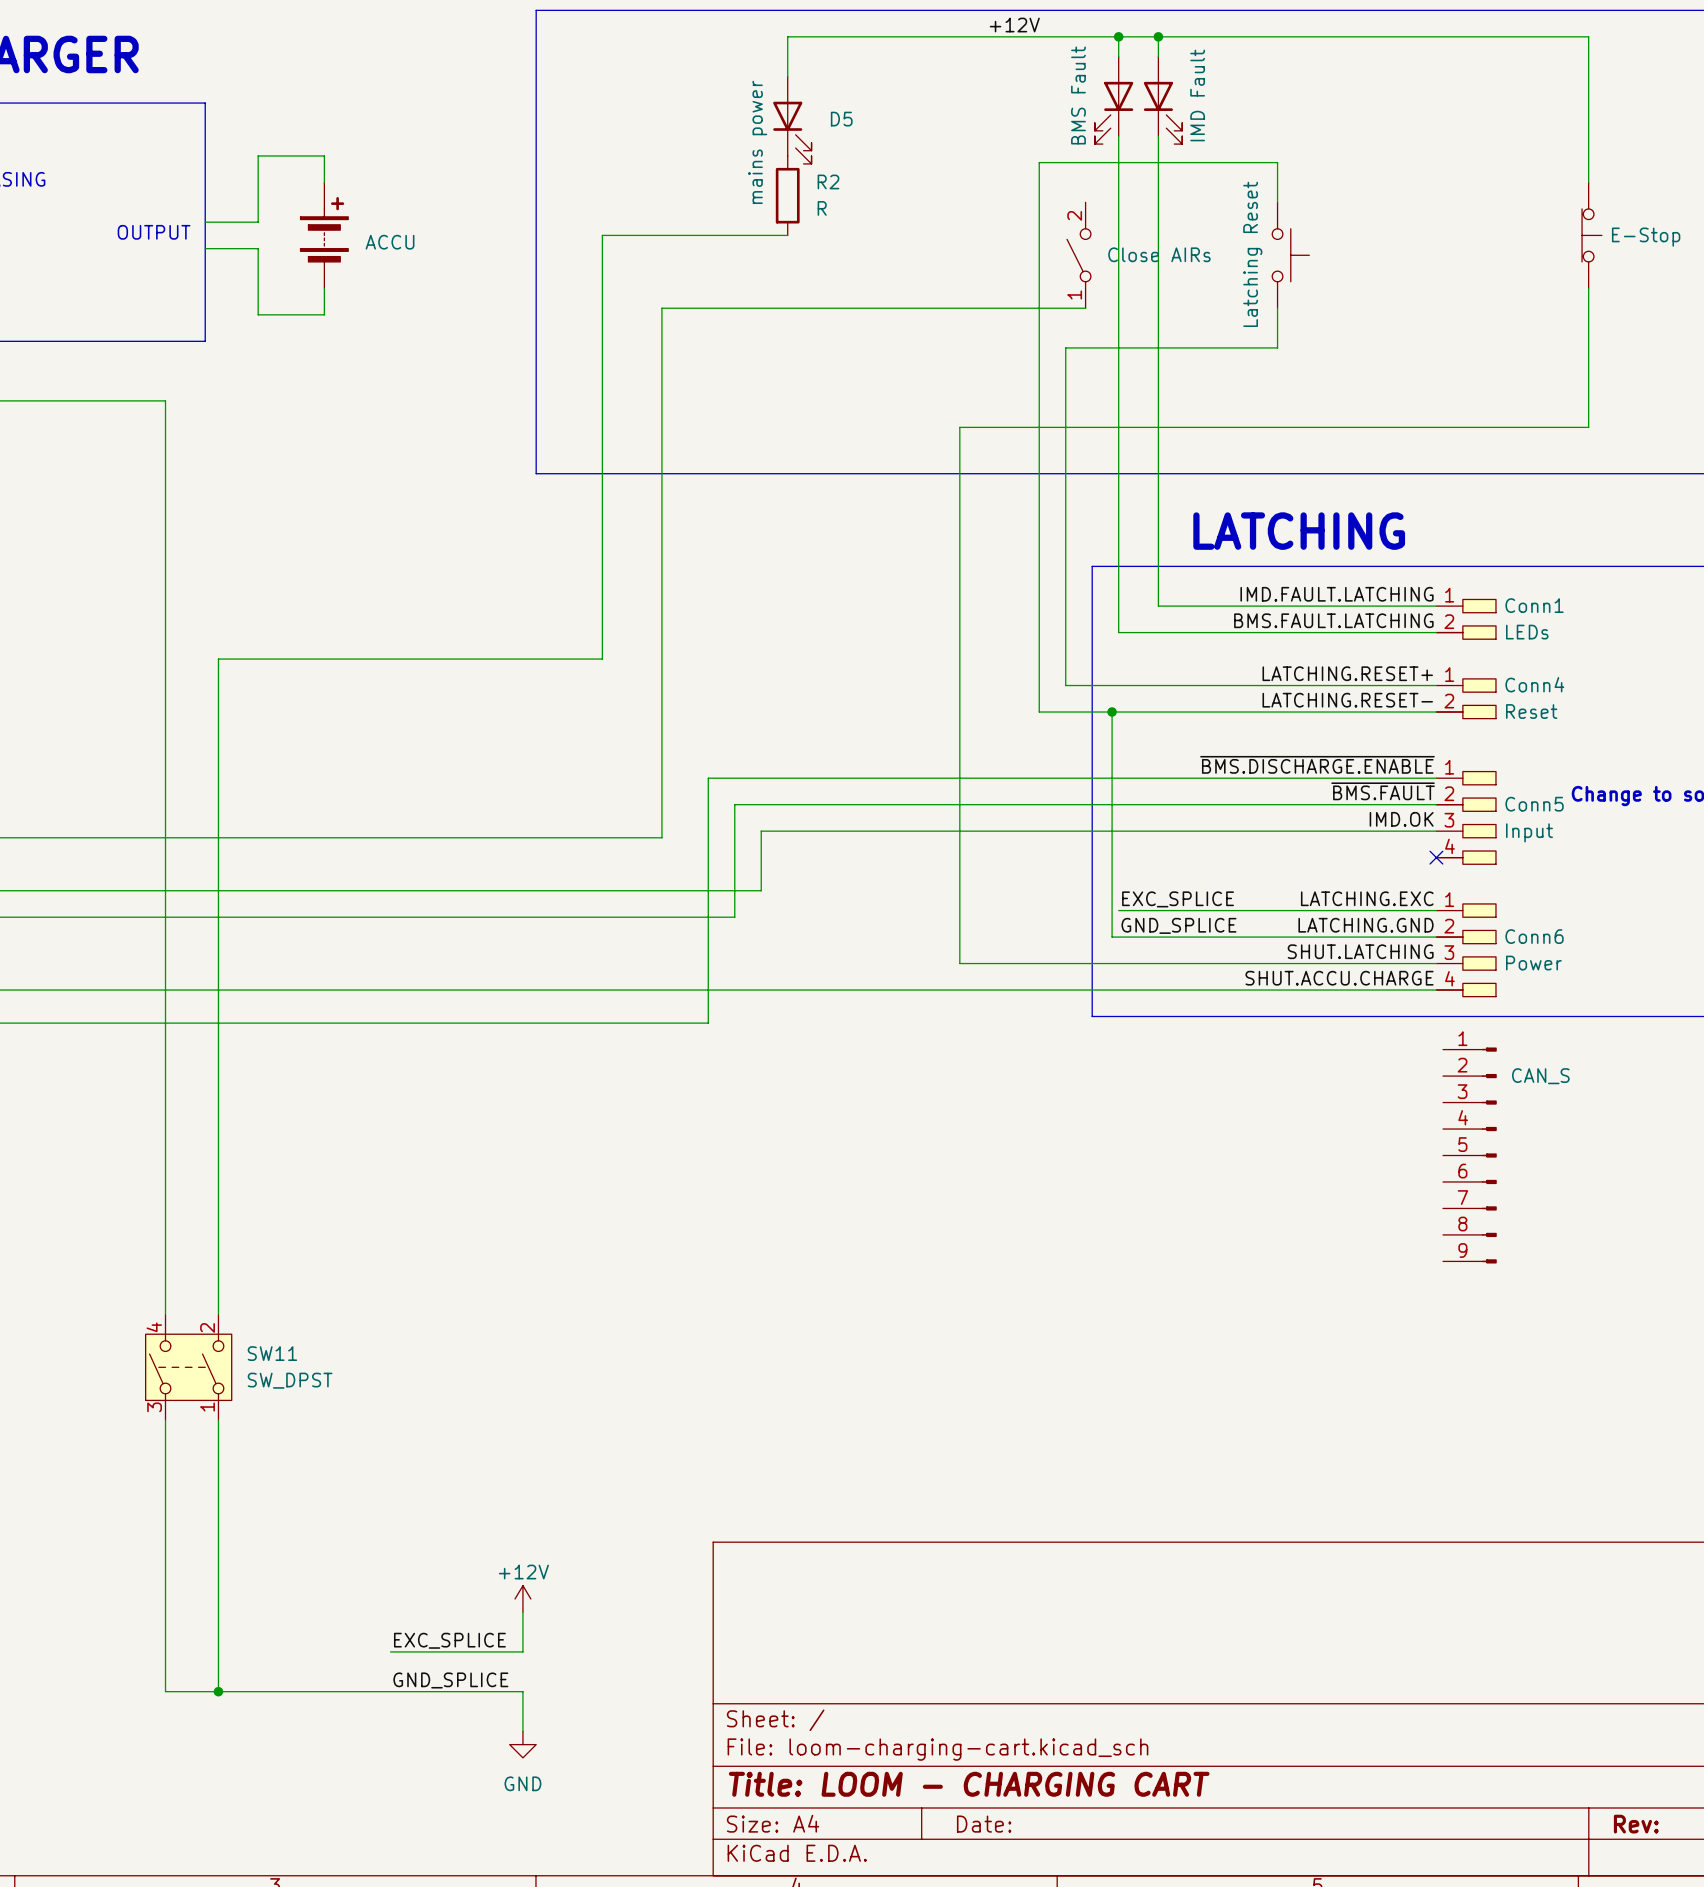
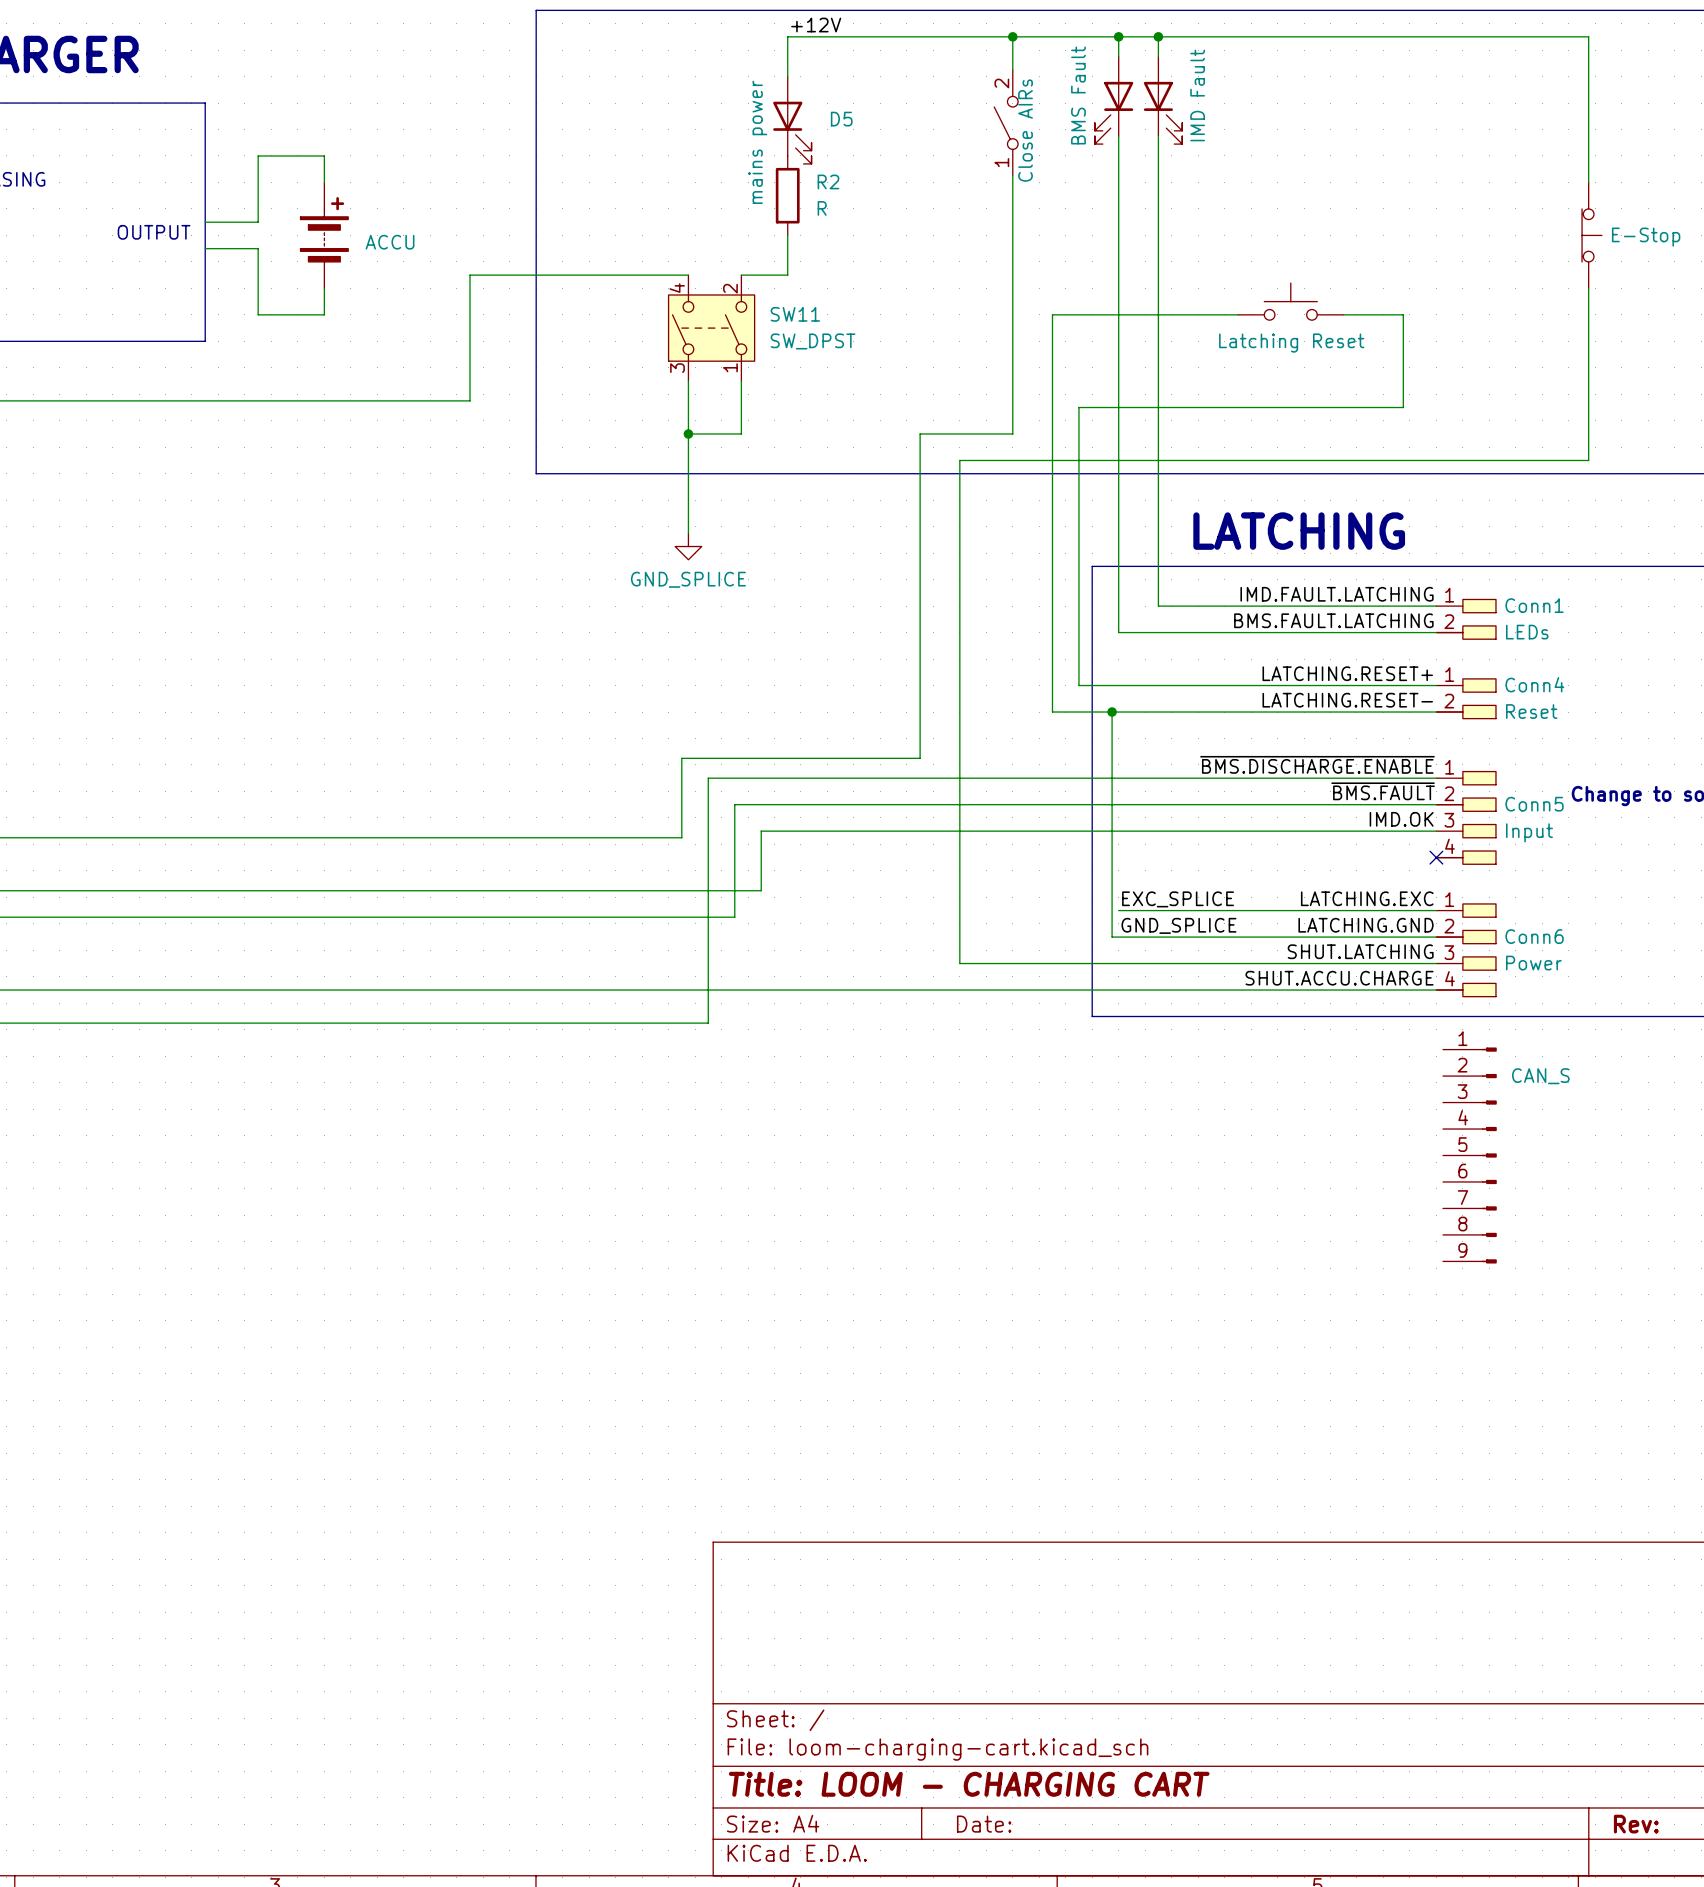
label position: +12V (1014, 25) -> +12V (816, 25)
wire: none -> (1012, 36) (1012, 69)
junction: none -> (1012, 36)
wire: (1277, 202) (1277, 162) (1039, 162) (1039, 712) (1052, 712) -> (1237, 314) (1052, 314) (1052, 712)
wire: (787, 235) (602, 235) (602, 659) (218, 659) (218, 1314) -> (787, 235) (787, 275) (741, 275)
part value rotation: 0° (1159, 254) -> 90° counterclockwise (1025, 130)
part position: (1078, 255) -> (1006, 122)
part rotation: 0° (1290, 255) -> 90° counterclockwise (1290, 301)
wire: (1085, 308) (661, 308) (661, 837) -> (1012, 175) (1012, 434) (920, 434) (920, 758) (681, 758) (681, 837) (661, 837)
wire: (1277, 308) (1277, 347) (1065, 347) (1065, 685) (1078, 685) -> (1343, 314) (1403, 314) (1403, 407) (1078, 407) (1078, 685)
wire: none -> (688, 381) (688, 533)
wire: none -> (741, 381) (741, 434) (688, 434)
wire: (165, 400) (165, 1314) -> (165, 400) (469, 400) (469, 275) (688, 275)
wire: (1588, 427) (959, 427) (959, 460) -> (1588, 427) (1588, 460) (959, 460)
junction: none -> (688, 434)
power symbol: none -> GND_SPLICE (688, 546)
SW11 position: (188, 1367) -> (711, 328)
wire: (165, 1420) (165, 1691) (522, 1691) (522, 1731) -> none
wire: (218, 1420) (218, 1691) -> none
power symbol: +12V (522, 1598) -> none
wire: (522, 1612) (522, 1651) (390, 1651) -> none
label: EXC_SPLICE (449, 1640) -> none
label: GND_SPLICE (450, 1680) -> none
junction: (218, 1691) -> none
power symbol: GND (522, 1744) -> none

